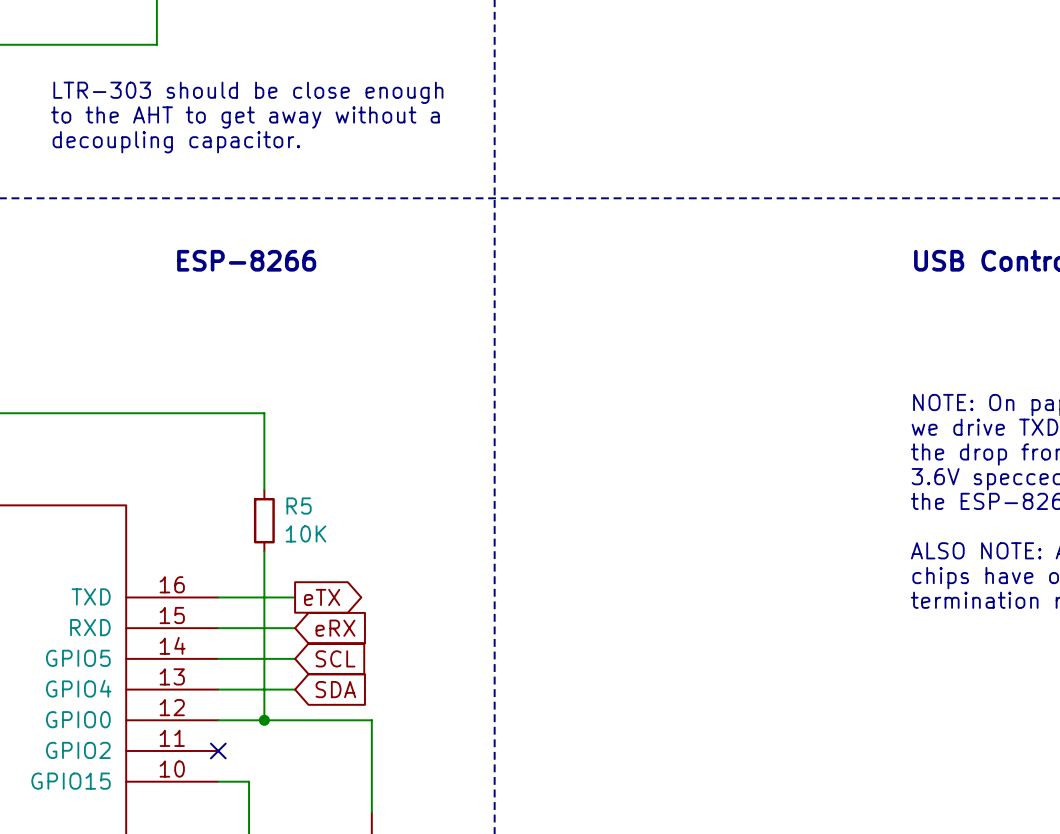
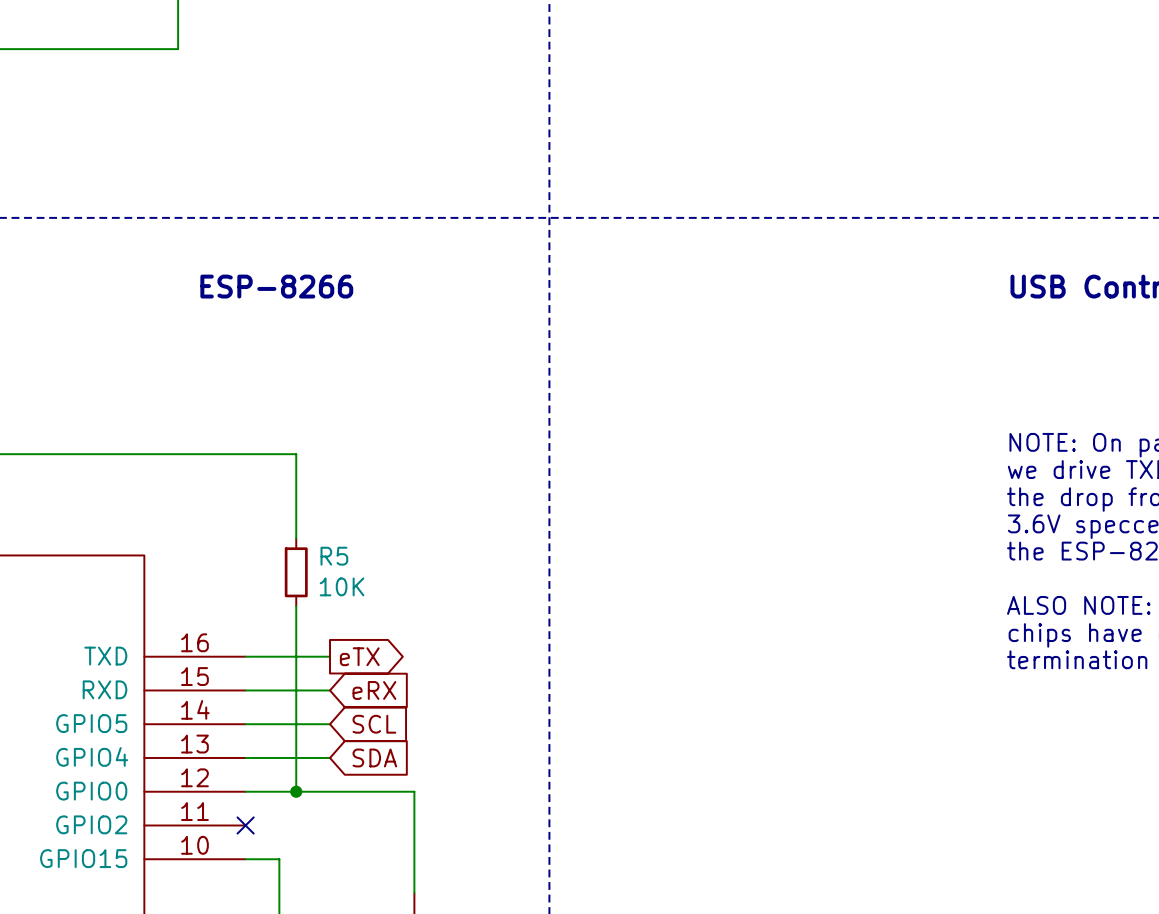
text: LTR-303 should be close enough (248, 92) -> none
text: to the AHT to get away without a (245, 117) -> none
text: decoupling capacitor. (176, 142) -> none

